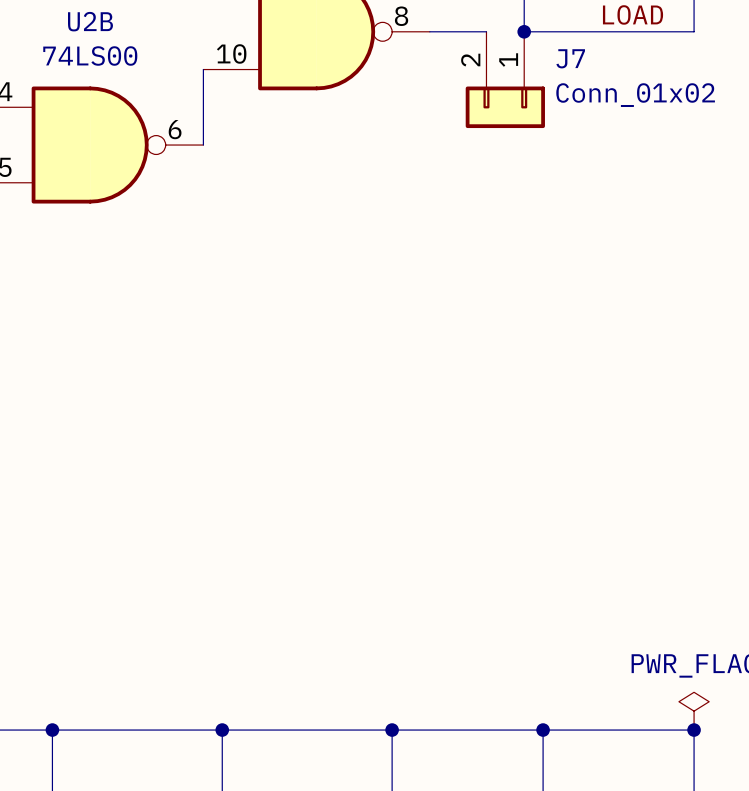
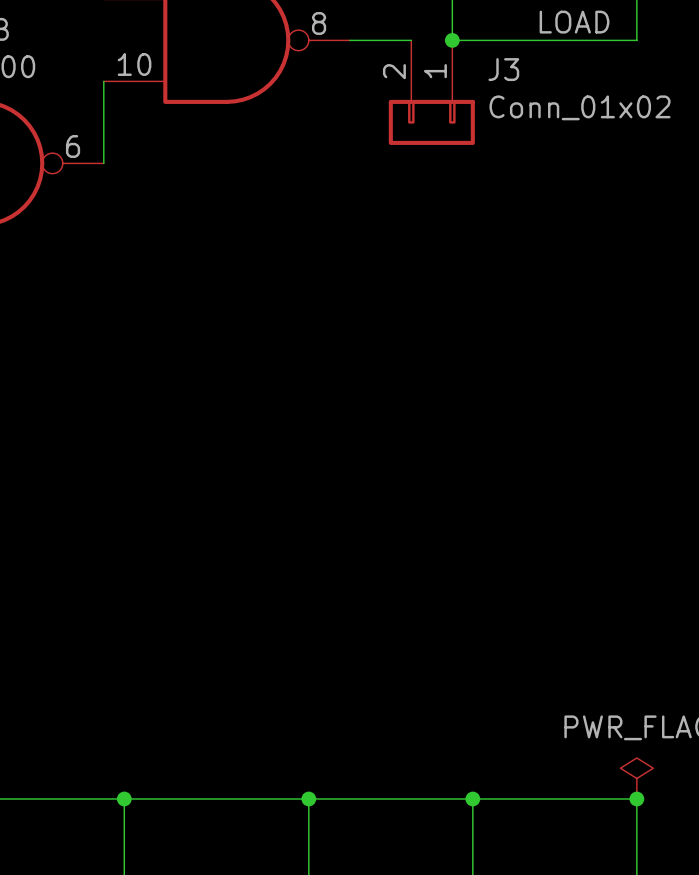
J7 name: J7 (570, 58) -> J3 (503, 69)

